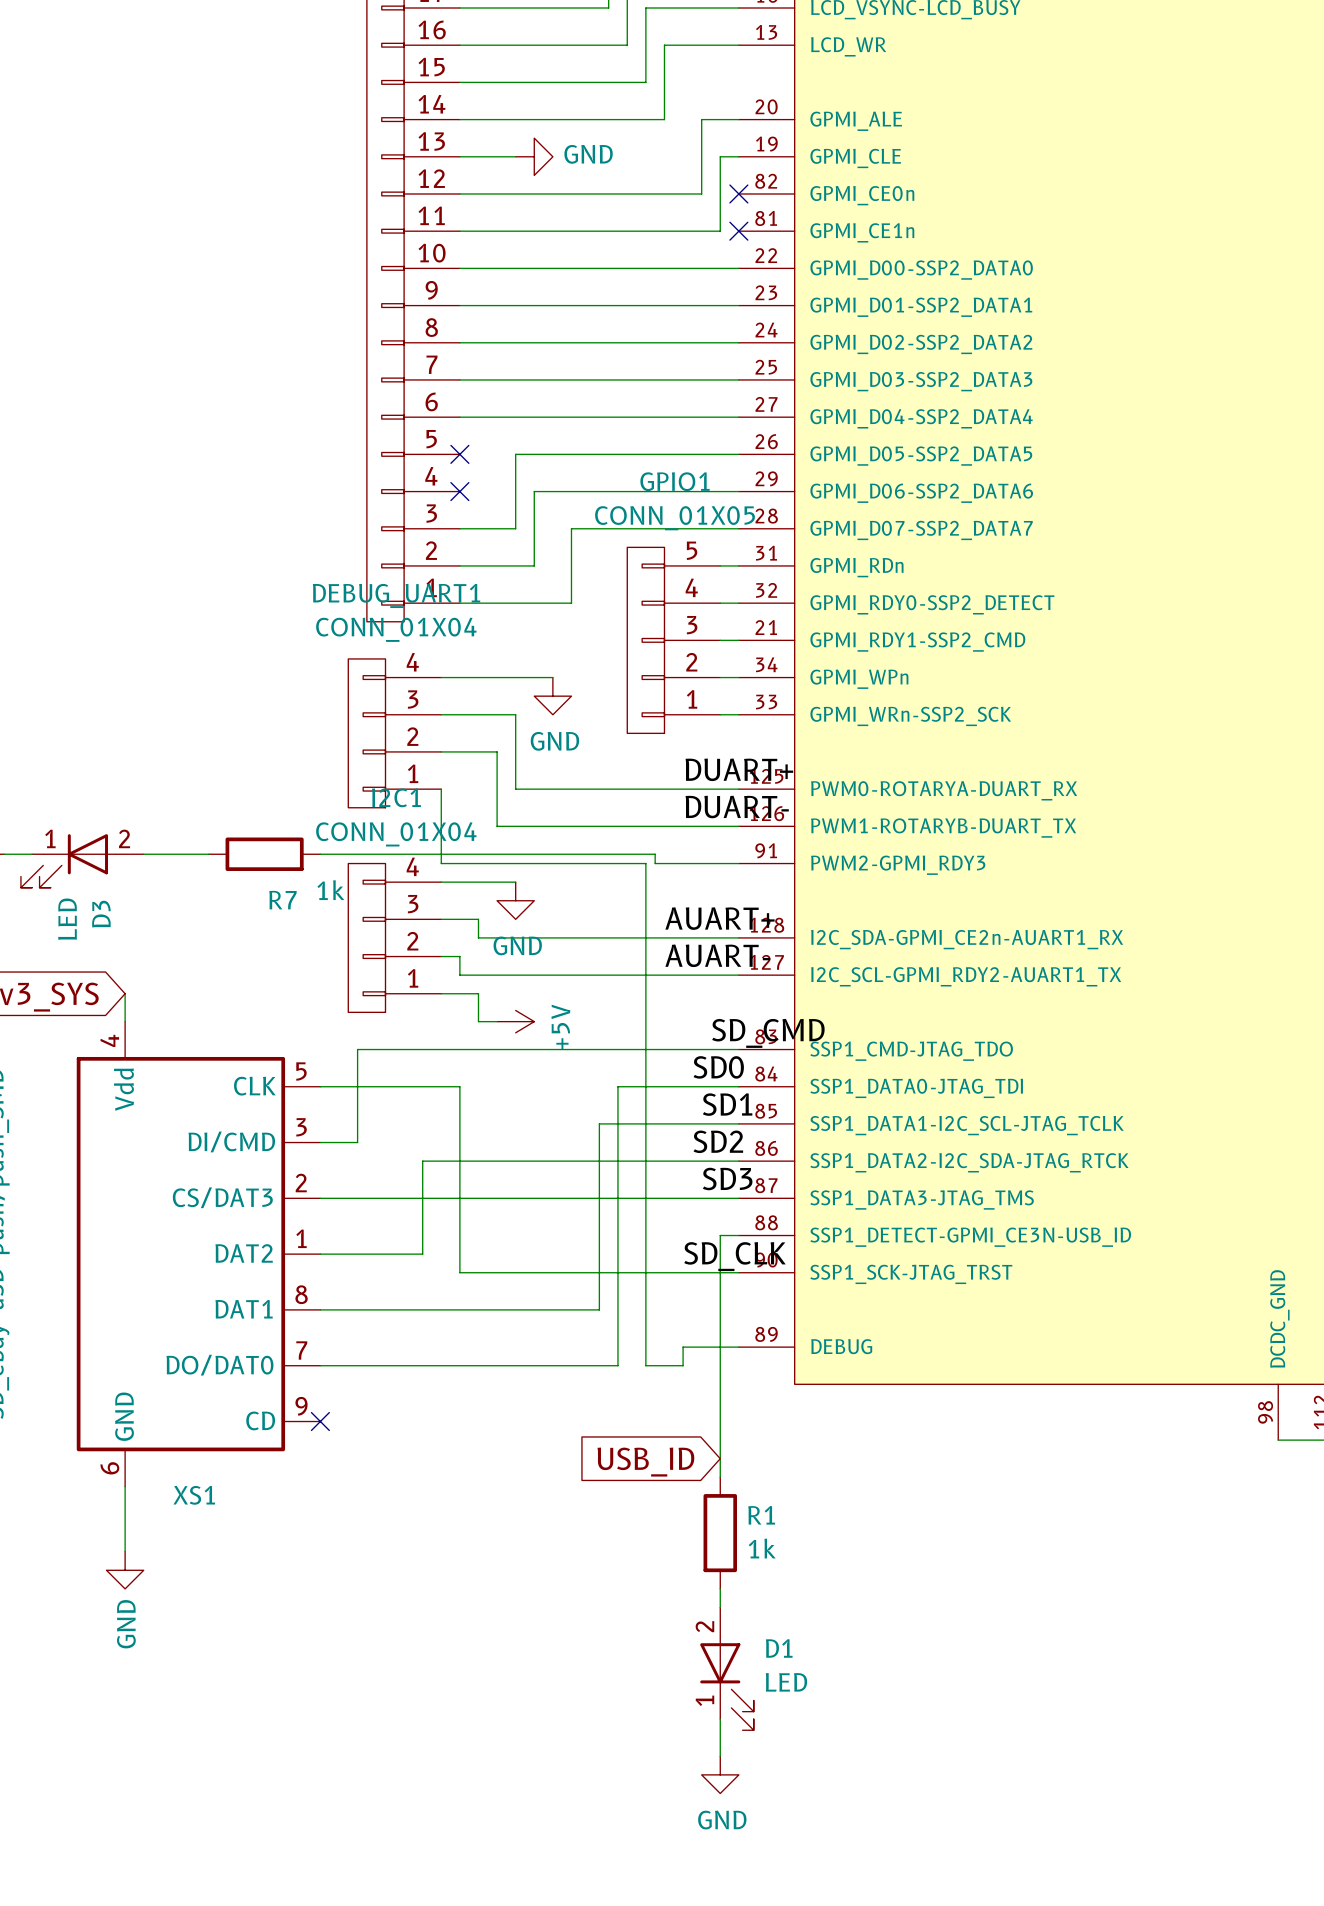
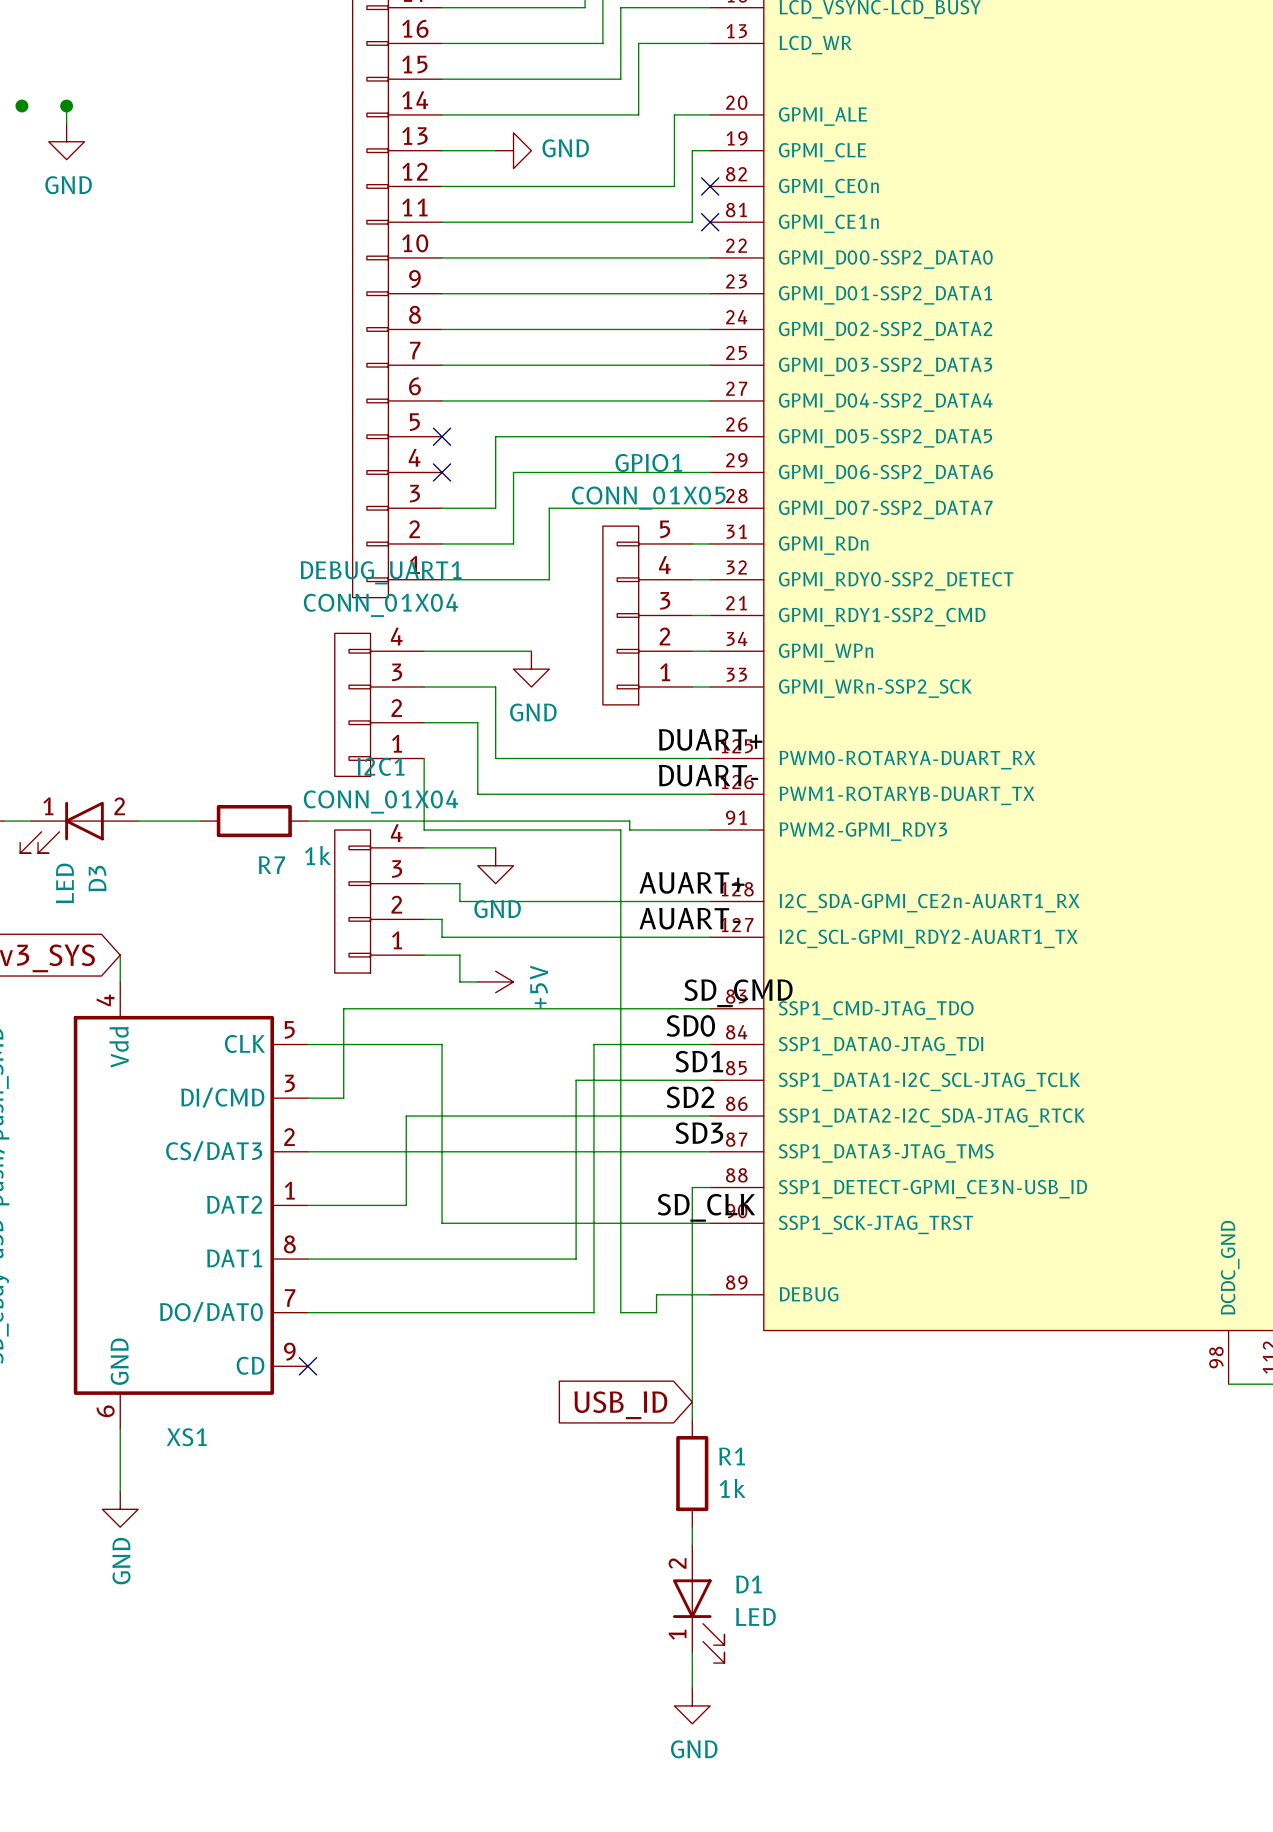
junction: none -> (21, 106)
wire: none -> (66, 106) (66, 123)
junction: none -> (66, 106)
power symbol: none -> GND (66, 141)

